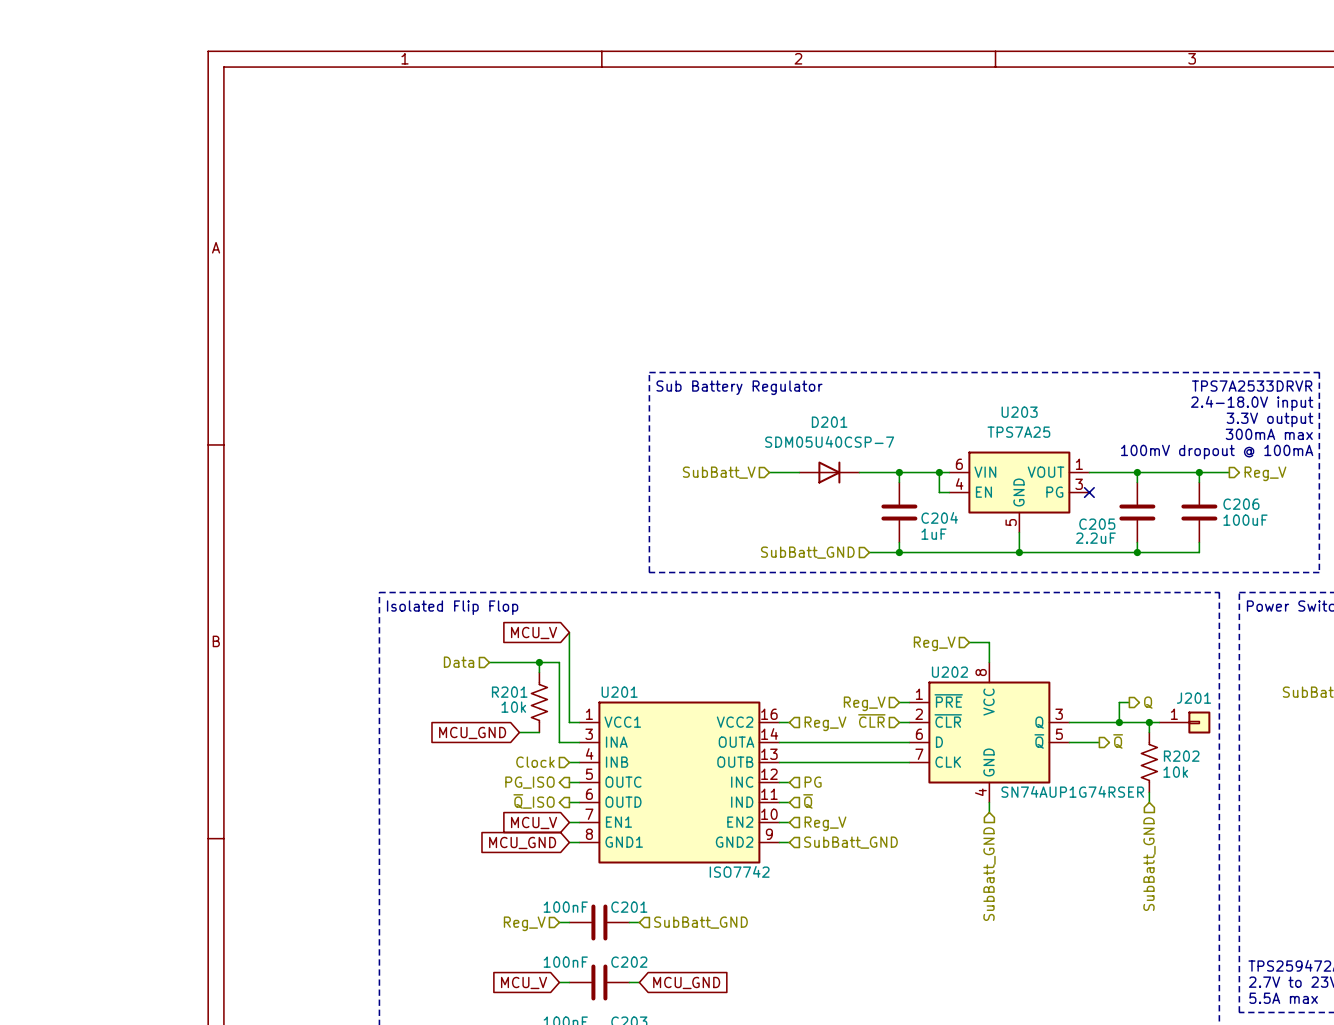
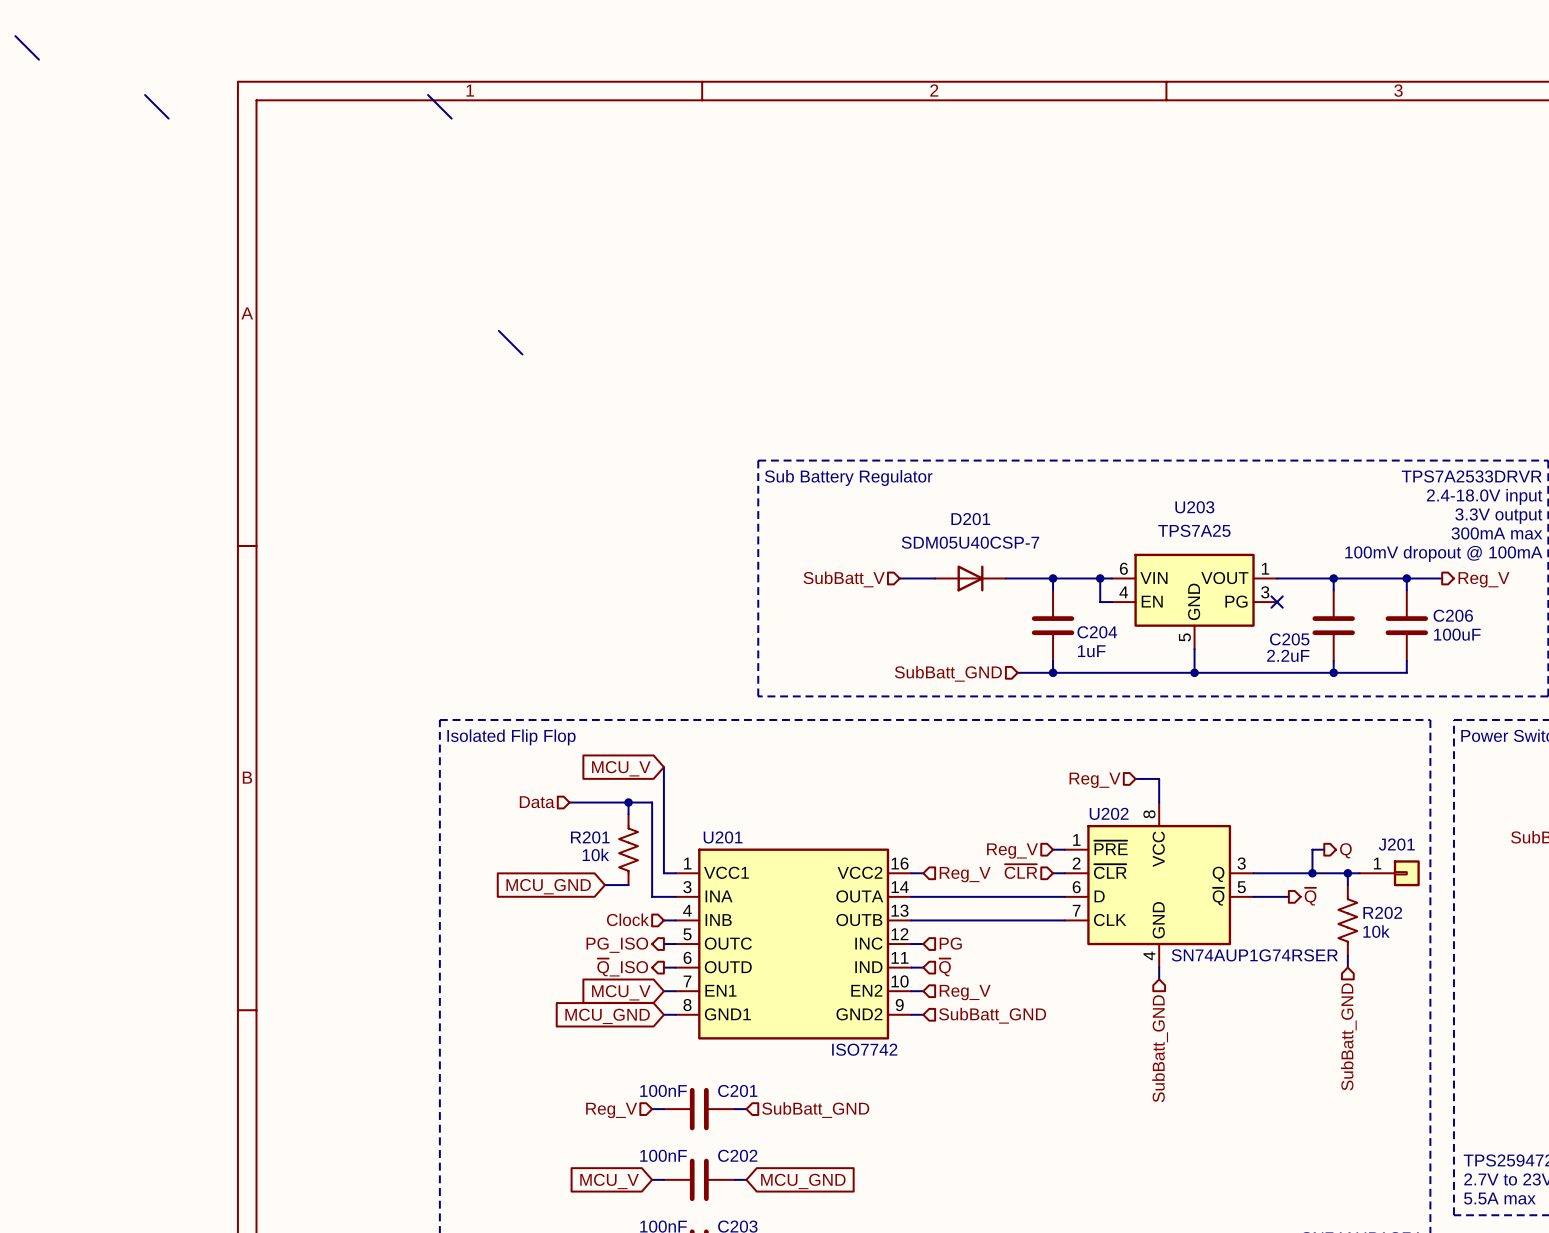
wire: none -> (15, 36) (38, 59)
wire: none -> (145, 95) (168, 118)
wire: none -> (428, 95) (451, 118)
wire: none -> (498, 330) (522, 354)

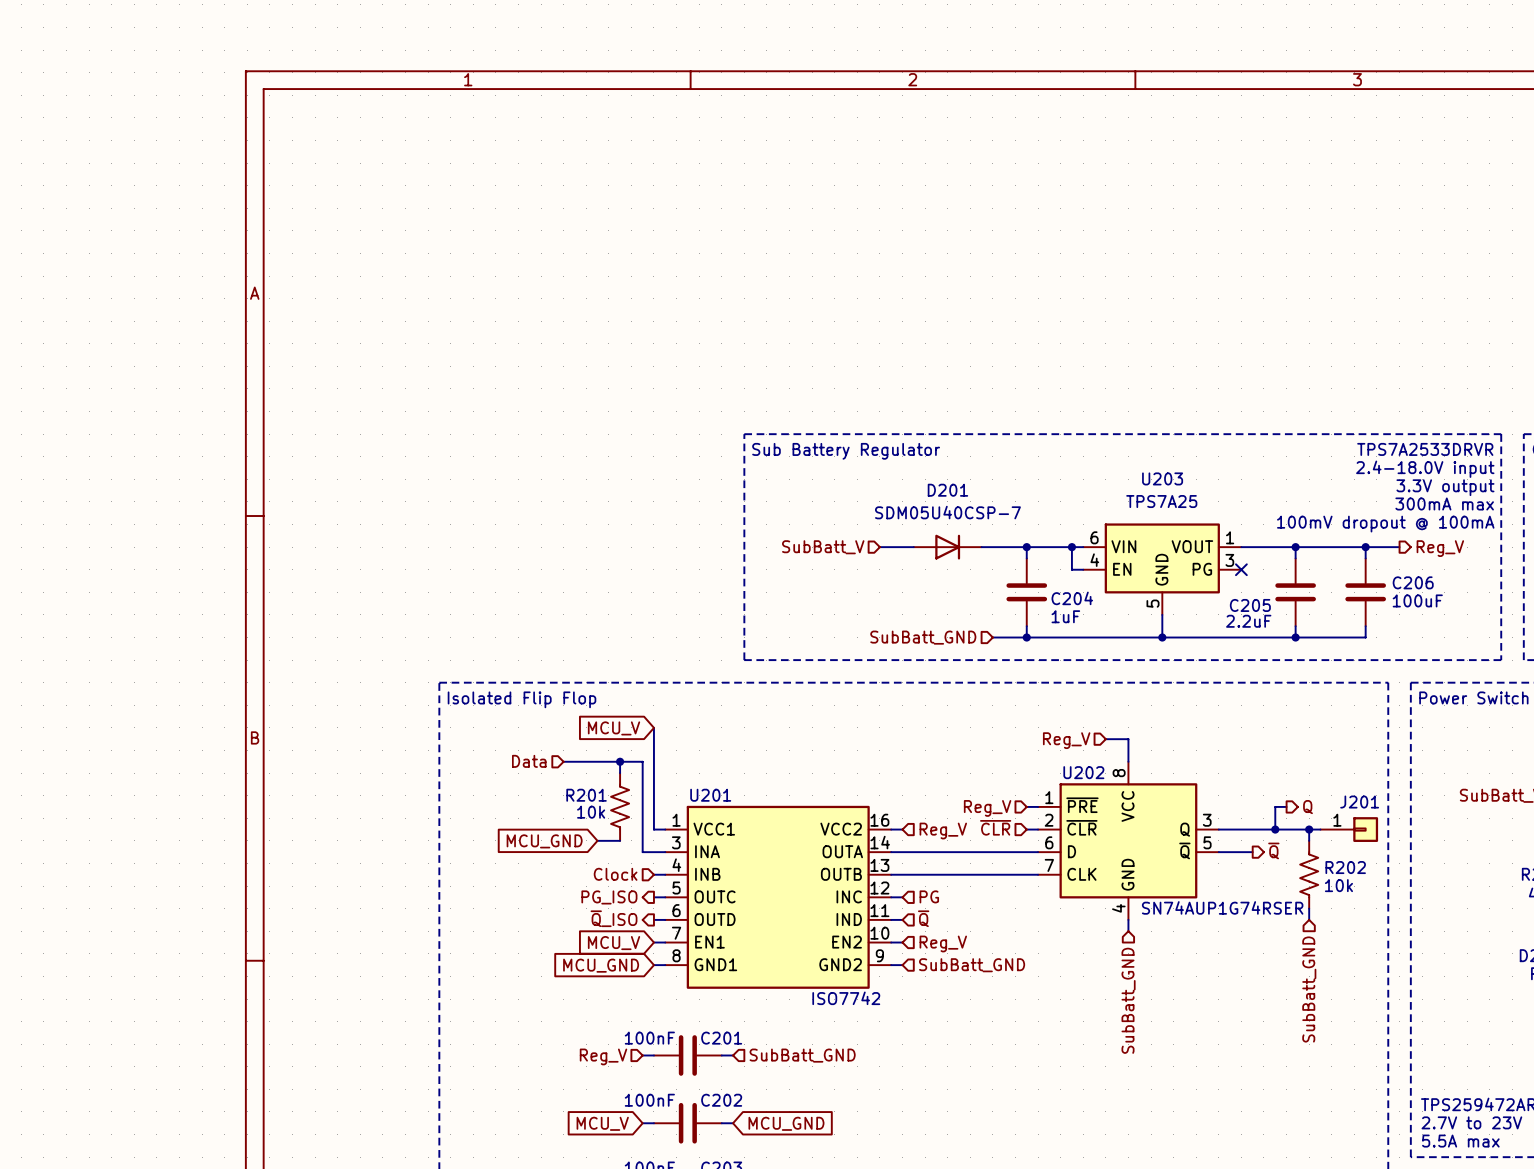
wire: (15, 36) (38, 59) -> none
wire: (145, 95) (168, 118) -> none
wire: (428, 95) (451, 118) -> none
wire: (498, 330) (522, 354) -> none

